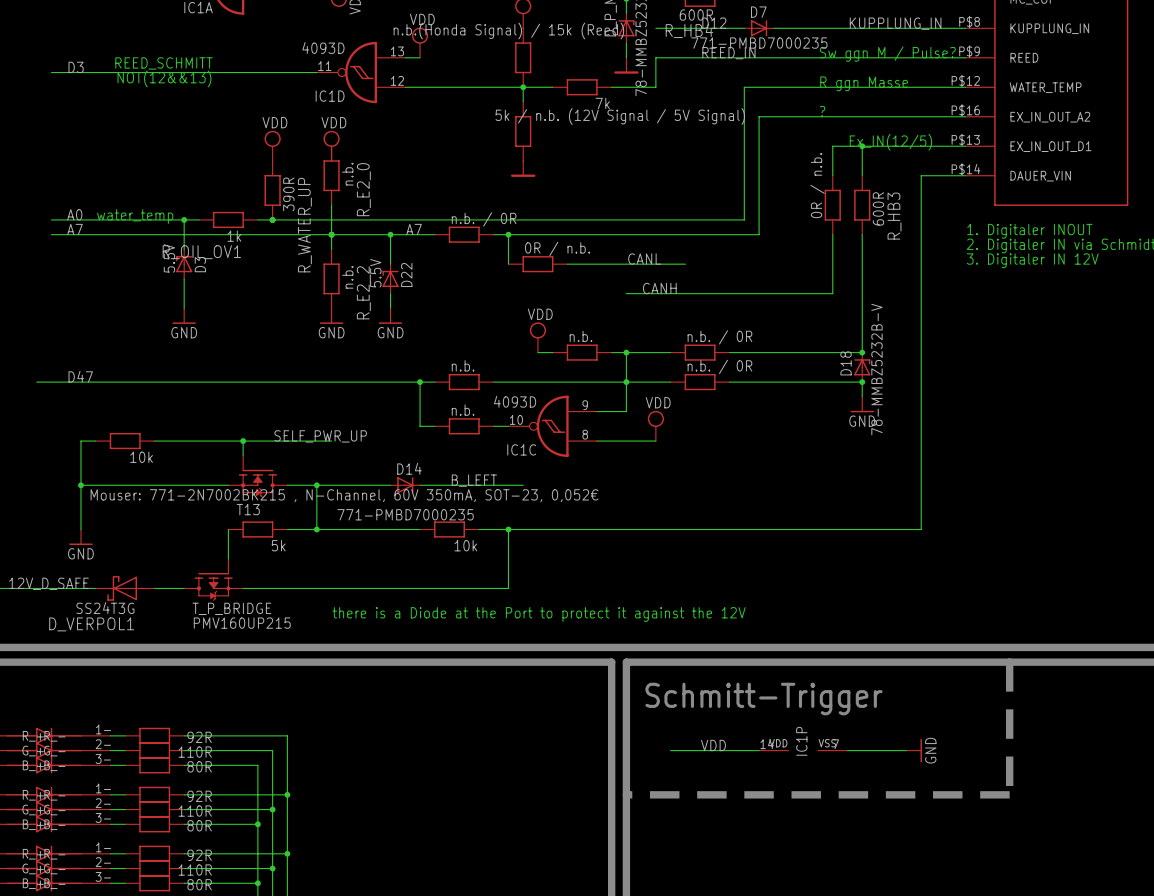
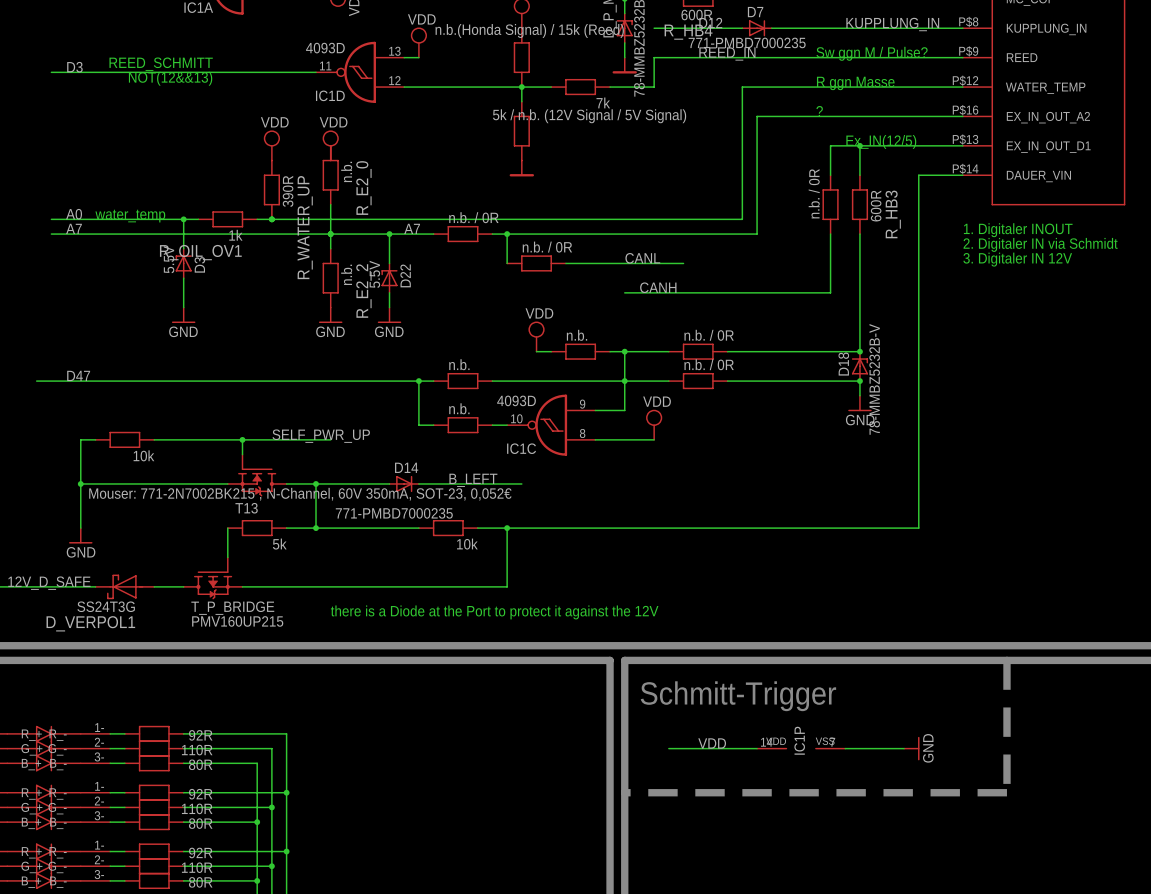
part value: 0R / n.b. (817, 185) -> n.b. / 0R (814, 193)
part value: 0R / n.b. (557, 248) -> n.b. / 0R (547, 247)

